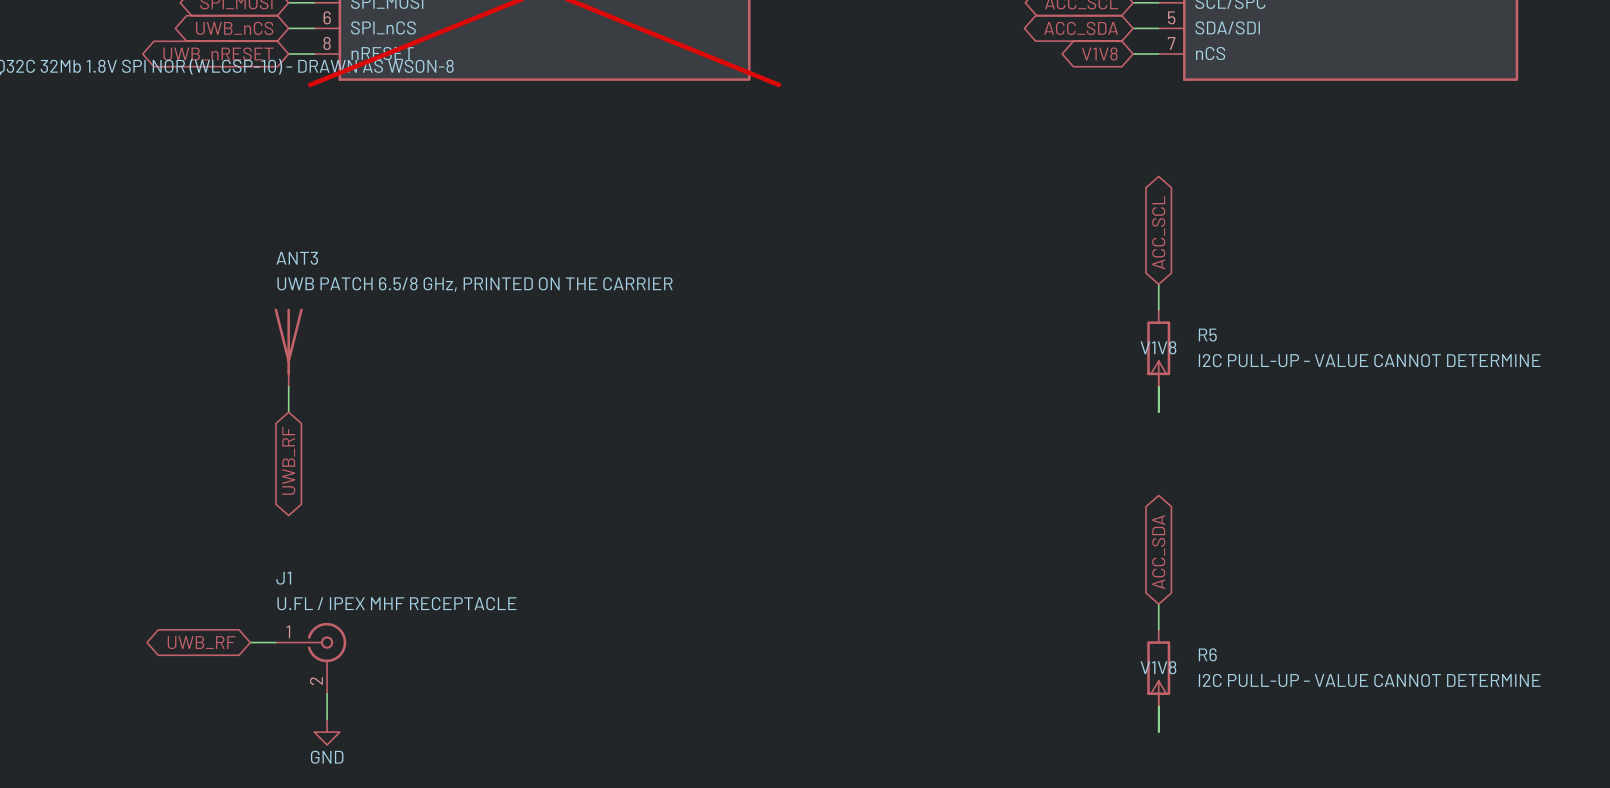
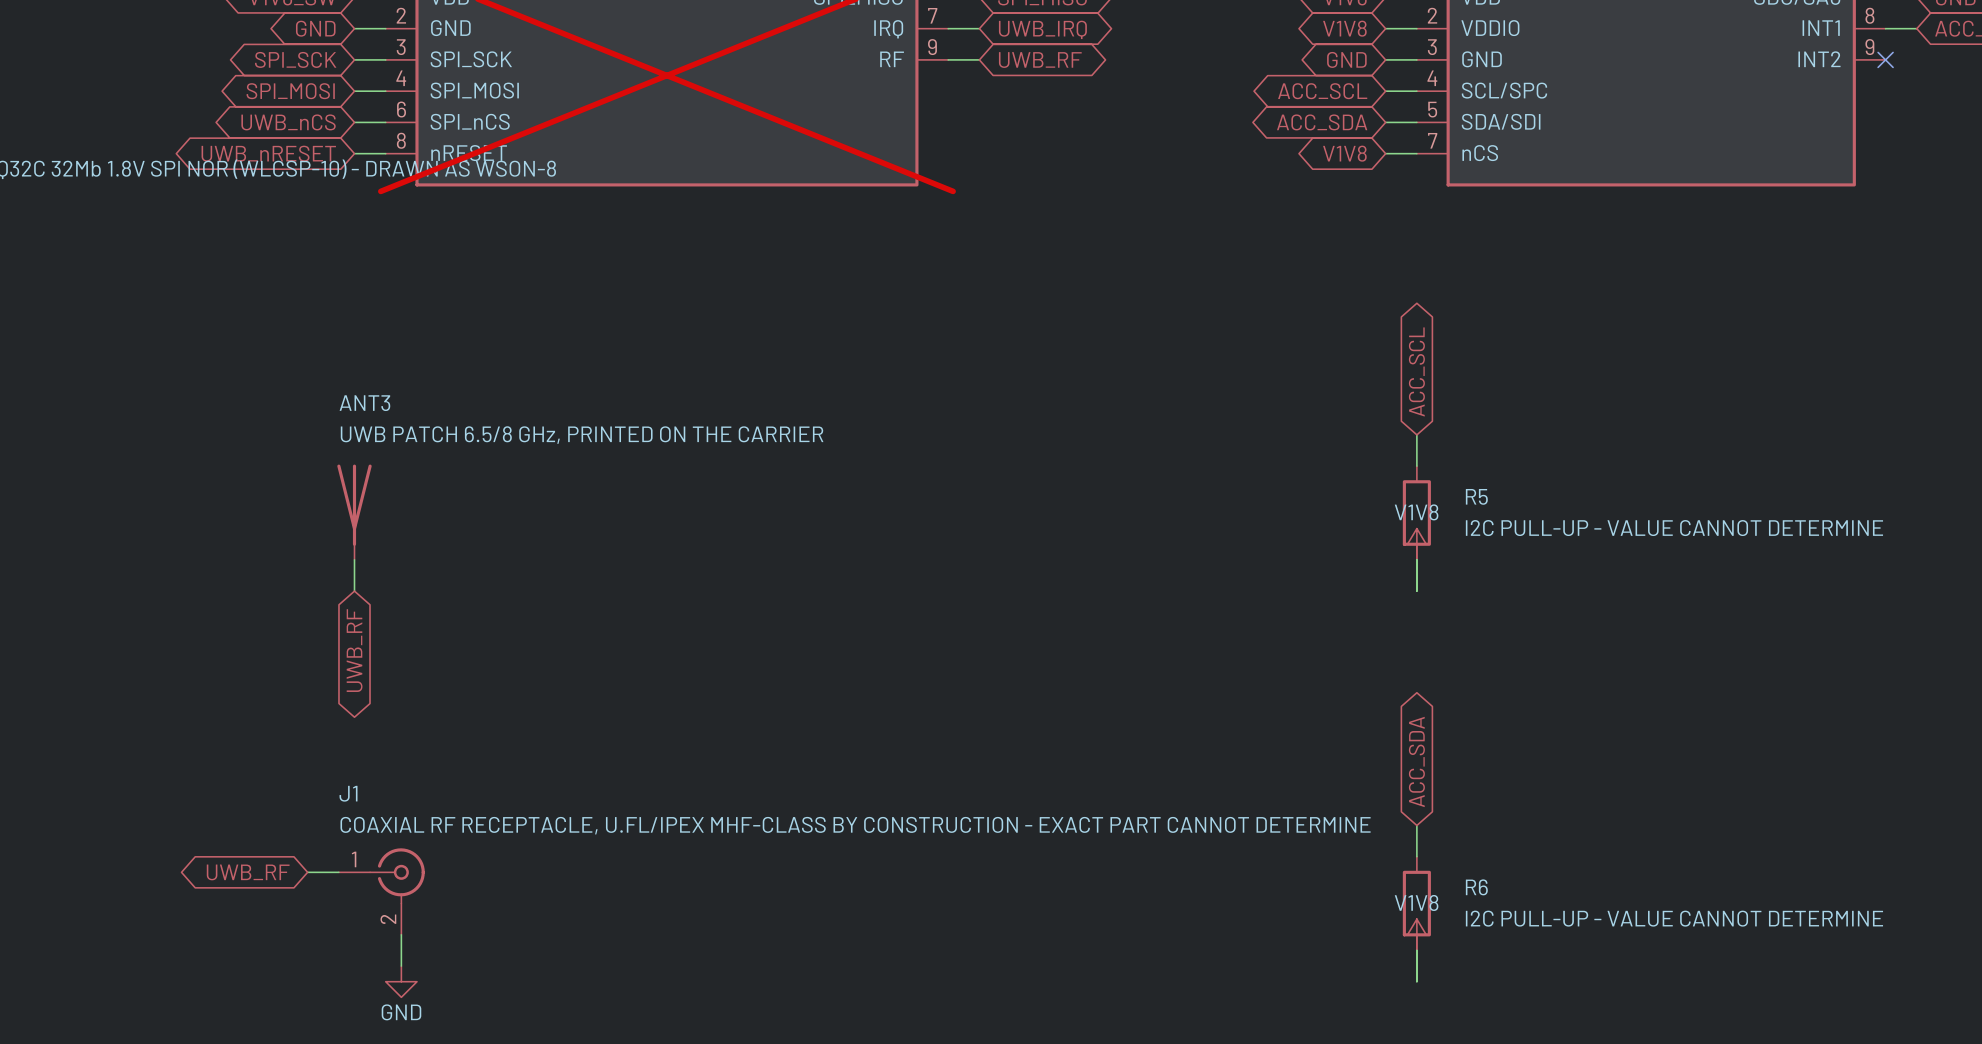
J1 value: U.FL / IPEX MHF RECEPTACLE (396, 603) -> COAXIAL RF RECEPTACLE, U.FL/IPEX MHF-CLASS BY CONSTRUCTION - EXACT PART CANNOT DETERMINE (855, 825)

